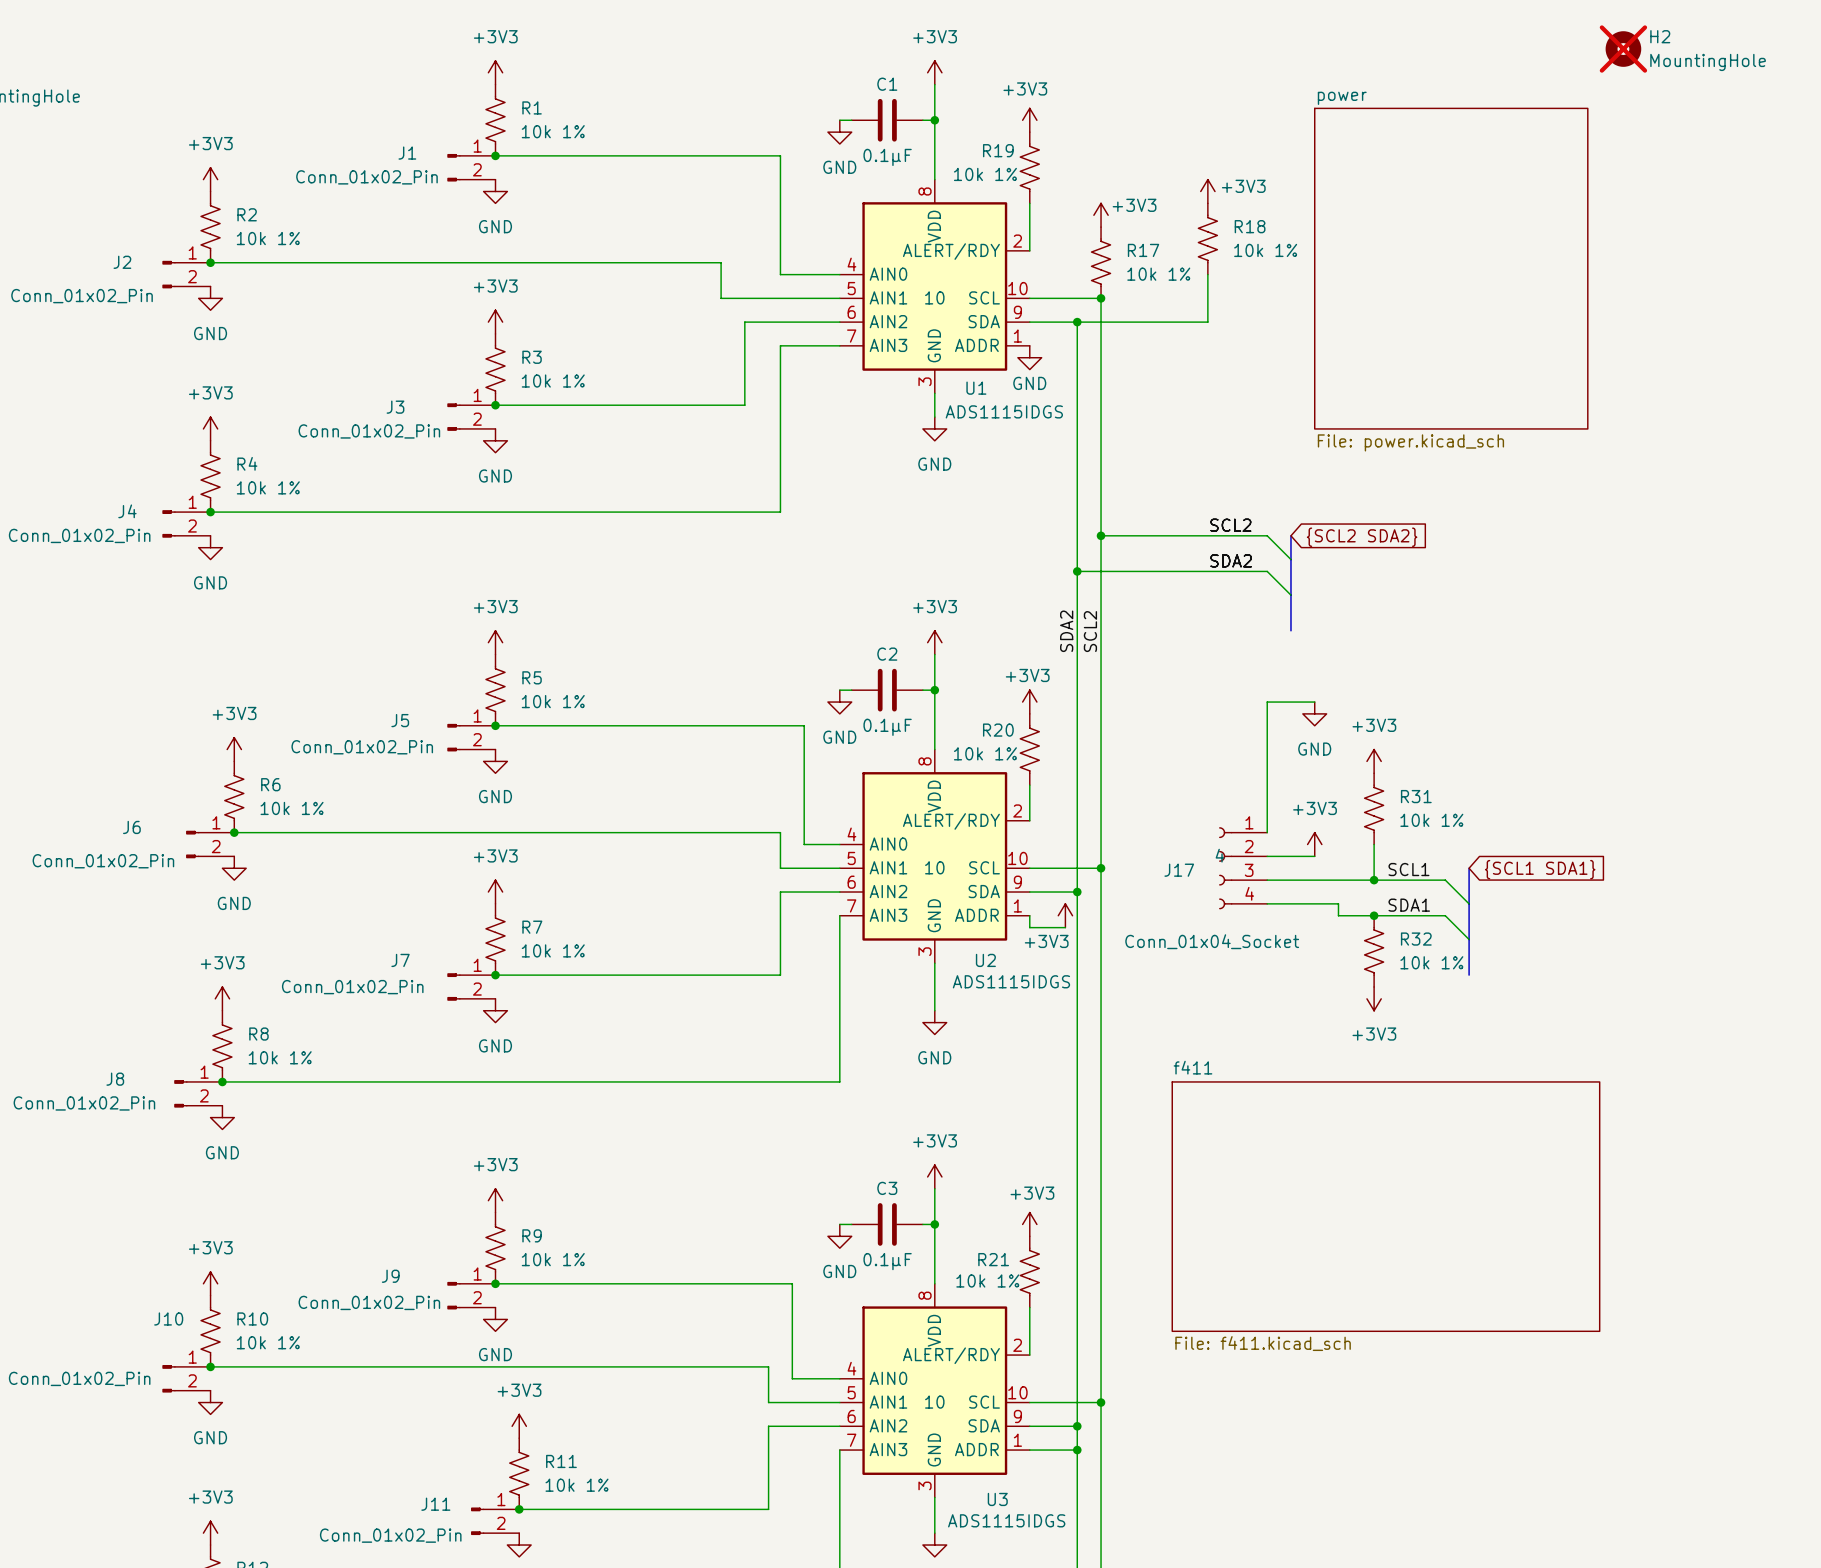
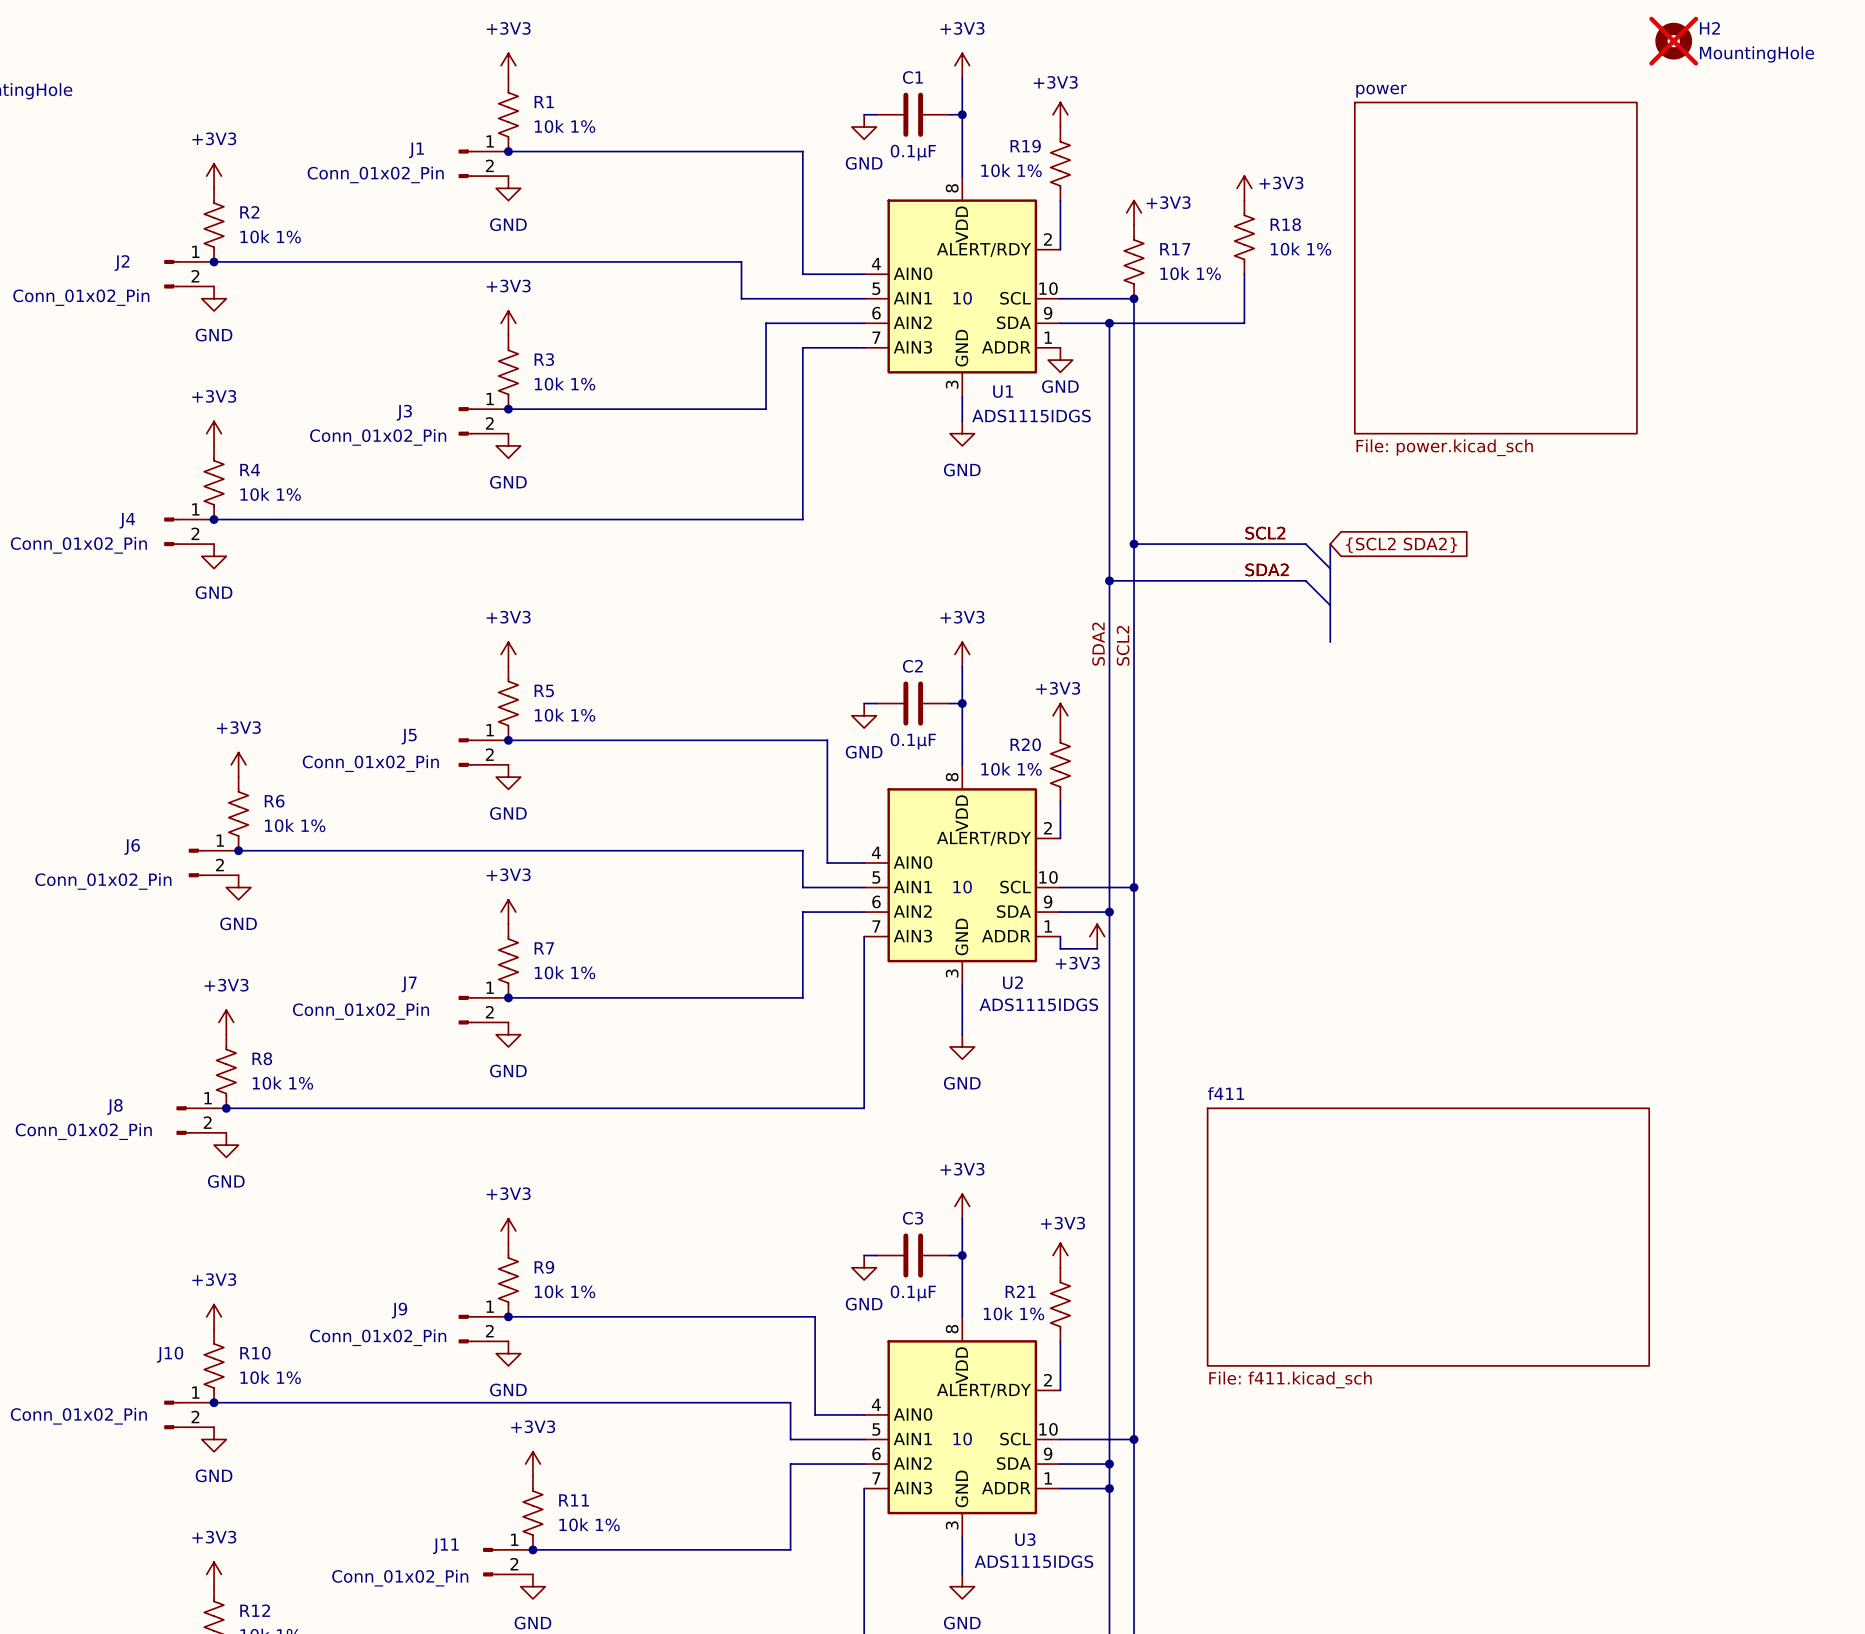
wire: (1314, 702) (1267, 702) (1267, 832) -> none
power symbol: GND (1314, 713) -> none
power symbol: +3V3 (1374, 761) -> none
R31: 10k 1% (1374, 808) -> none
power symbol: +3V3 (1314, 844) -> none
wire: (1374, 844) (1374, 880) -> none
wire: (1267, 856) (1314, 856) -> none
J17: Conn_01x04_Socket (1243, 868) -> none
bus: (1469, 868) (1469, 975) -> none
label: SCL1 (1408, 869) -> none
global label: {SCL1 SDA1} (1540, 869) -> none
wire: (1267, 880) (1445, 880) (1469, 903) -> none
junction: (1374, 880) -> none
wire: (1267, 903) (1338, 903) (1338, 915) (1445, 915) (1469, 939) -> none
label: SDA1 (1409, 905) -> none
junction: (1374, 915) -> none
R32: 10k 1% (1374, 951) -> none
power symbol: +3V3 (1374, 998) -> none

